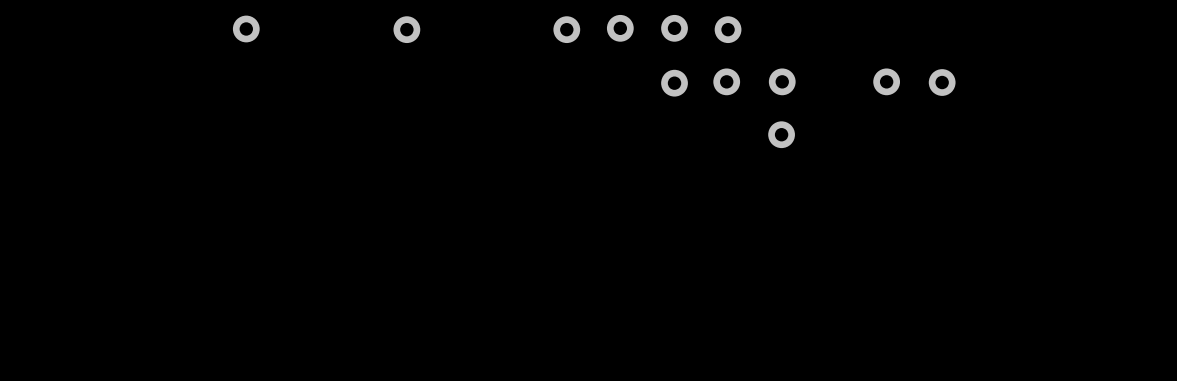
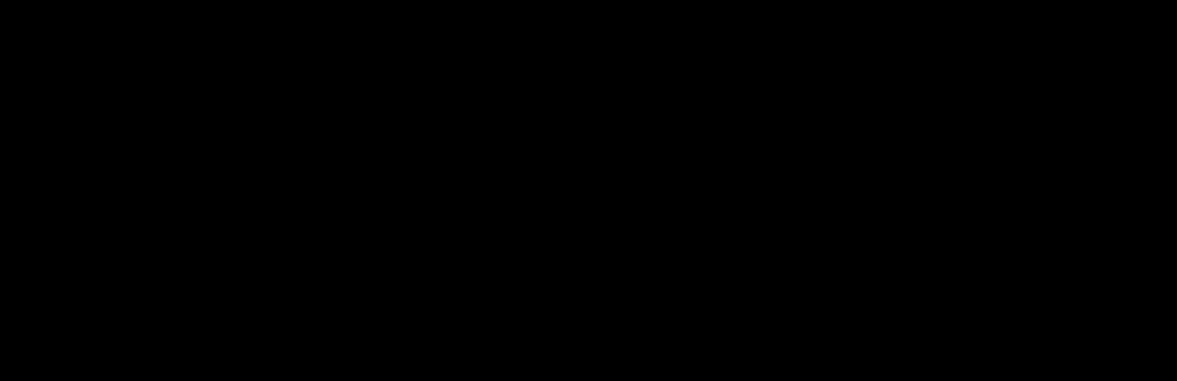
via: (246, 28) -> none
via: (620, 28) -> none
via: (674, 28) -> none
via: (406, 29) -> none
via: (566, 29) -> none
via: (728, 29) -> none
via: (726, 81) -> none
via: (782, 81) -> none
via: (886, 81) -> none
via: (942, 82) -> none
via: (674, 83) -> none
via: (781, 134) -> none

